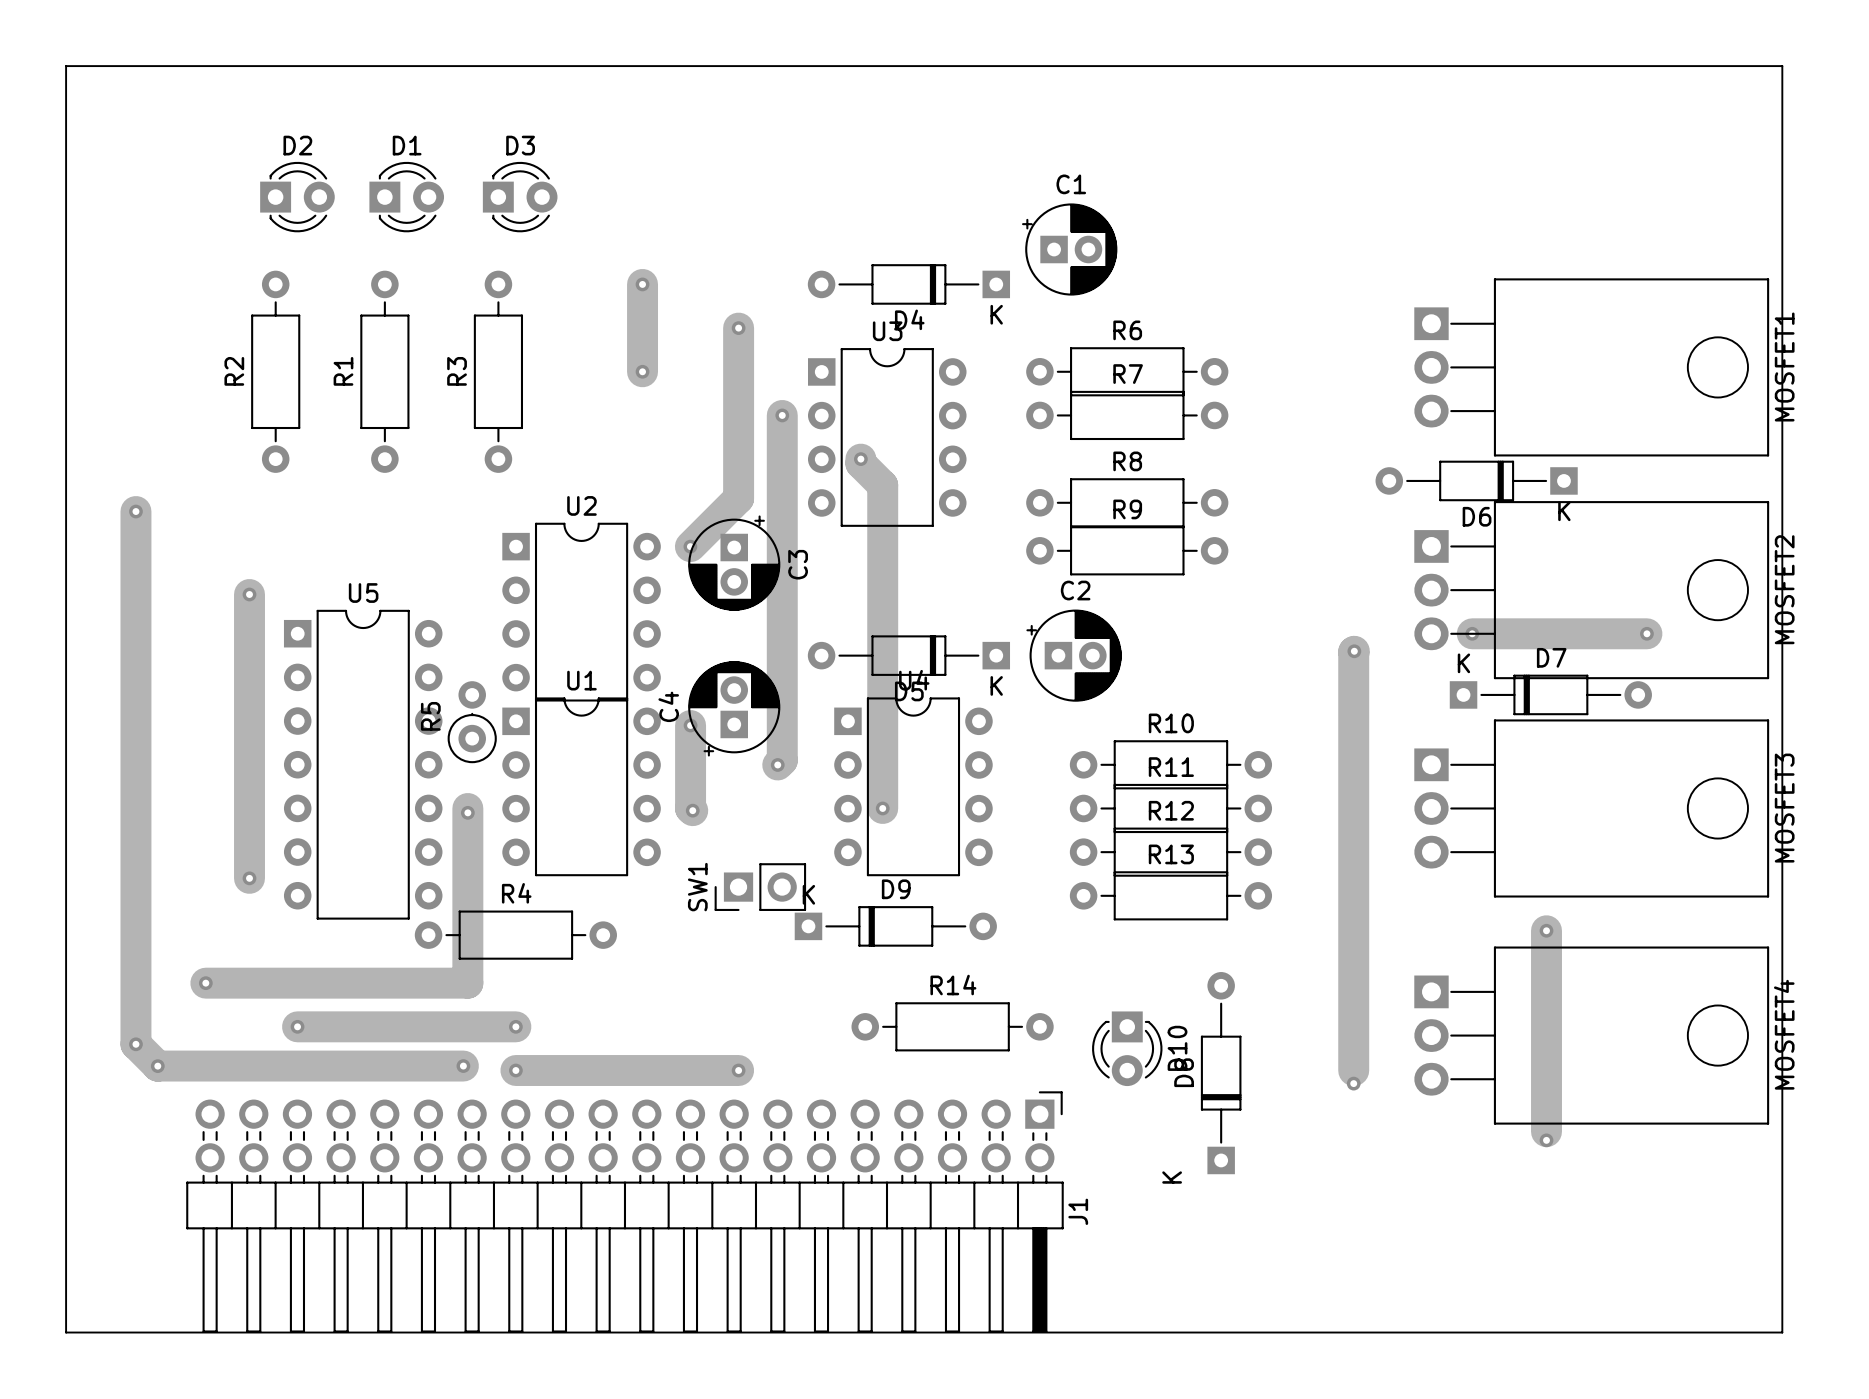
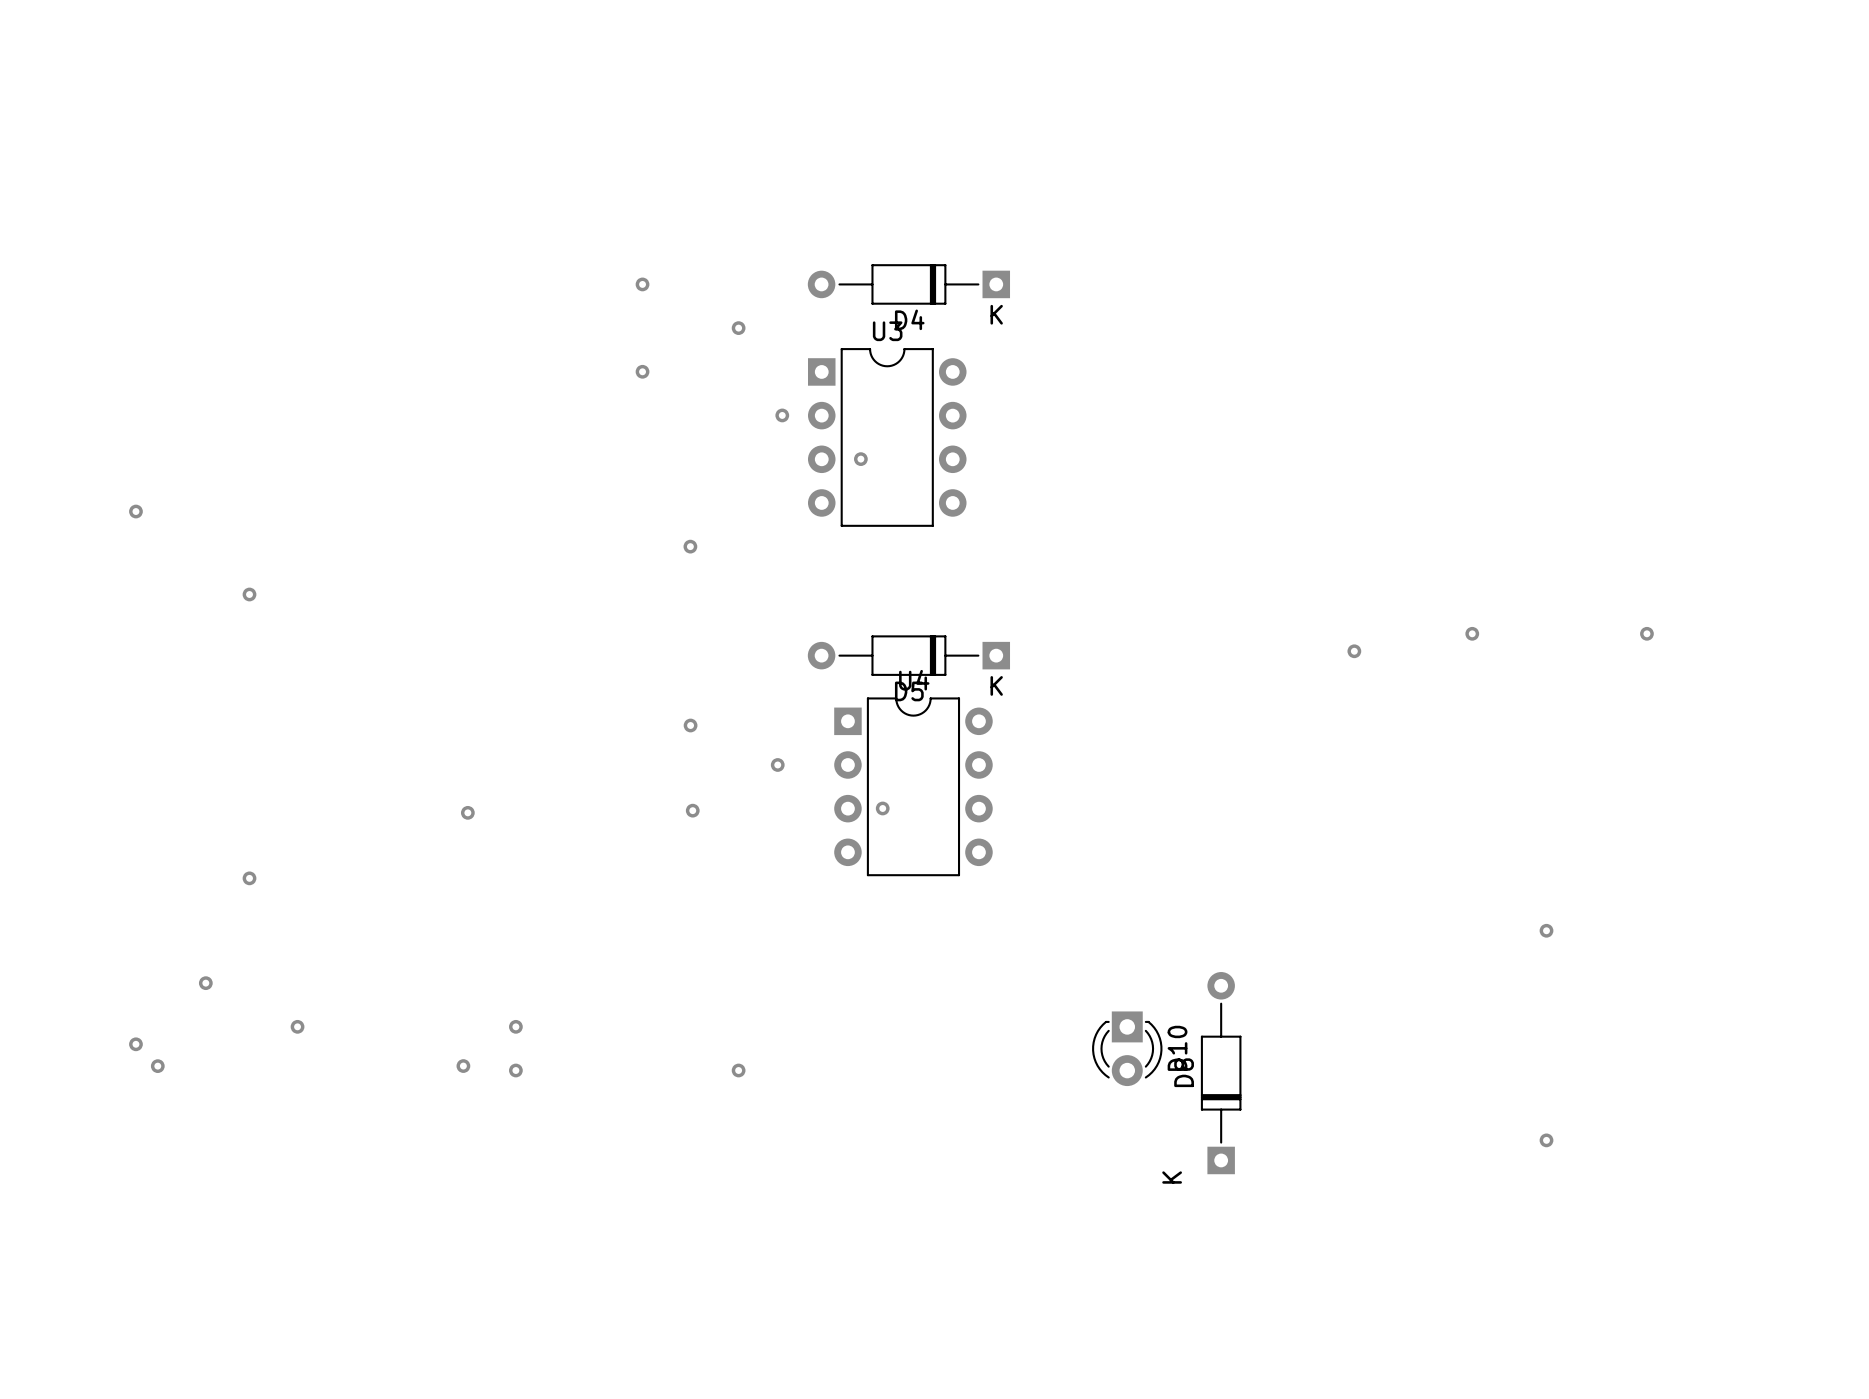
board edge: (66, 66) (66, 1332) (1782, 1332) (1782, 66) (66, 66) -> none
D2: (297, 197) -> none
D1: (406, 197) -> none
D3: (520, 197) -> none
C1: (1069, 249) -> none
track: (642, 284) (642, 371) -> none
track: (738, 328) (738, 498) (690, 546) -> none
MOSFET1: (1591, 367) -> none
R2: (275, 371) -> none
R1: (384, 371) -> none
R3: (498, 371) -> none
R6: (1127, 371) -> none
track: (782, 415) (782, 760) (777, 764) -> none
R7: (1127, 415) -> none
track: (860, 459) (860, 463) (882, 485) (882, 808) -> none
D6: (1476, 480) -> none
R8: (1127, 502) -> none
track: (135, 511) (135, 1044) (157, 1066) -> none
R9: (1127, 550) -> none
C3: (734, 563) -> none
MOSFET2: (1591, 590) -> none
track: (249, 594) (249, 878) -> none
U2: (581, 612) -> none
track: (1472, 633) (1646, 633) -> none
track: (1354, 651) (1353, 1070) -> none
C2: (1074, 655) -> none
D7: (1550, 694) -> none
C4: (734, 708) -> none
R5: (472, 722) -> none
track: (690, 725) (690, 808) (692, 810) -> none
U5: (363, 764) -> none
R10: (1170, 764) -> none
U1: (581, 786) -> none
track: (467, 808) (467, 983) (205, 983) -> none
R11: (1170, 808) -> none
MOSFET3: (1591, 808) -> none
R12: (1170, 852) -> none
SW1: (760, 887) -> none
R13: (1170, 895) -> none
D9: (895, 926) -> none
track: (1546, 930) (1546, 1131) -> none
R4: (515, 935) -> none
track: (297, 1026) (515, 1026) -> none
R14: (952, 1026) -> none
MOSFET4: (1591, 1035) -> none
track: (157, 1066) (463, 1066) -> none
track: (515, 1070) (738, 1070) -> none
via: (1353, 1083) -> none
J1: (624, 1211) -> none

